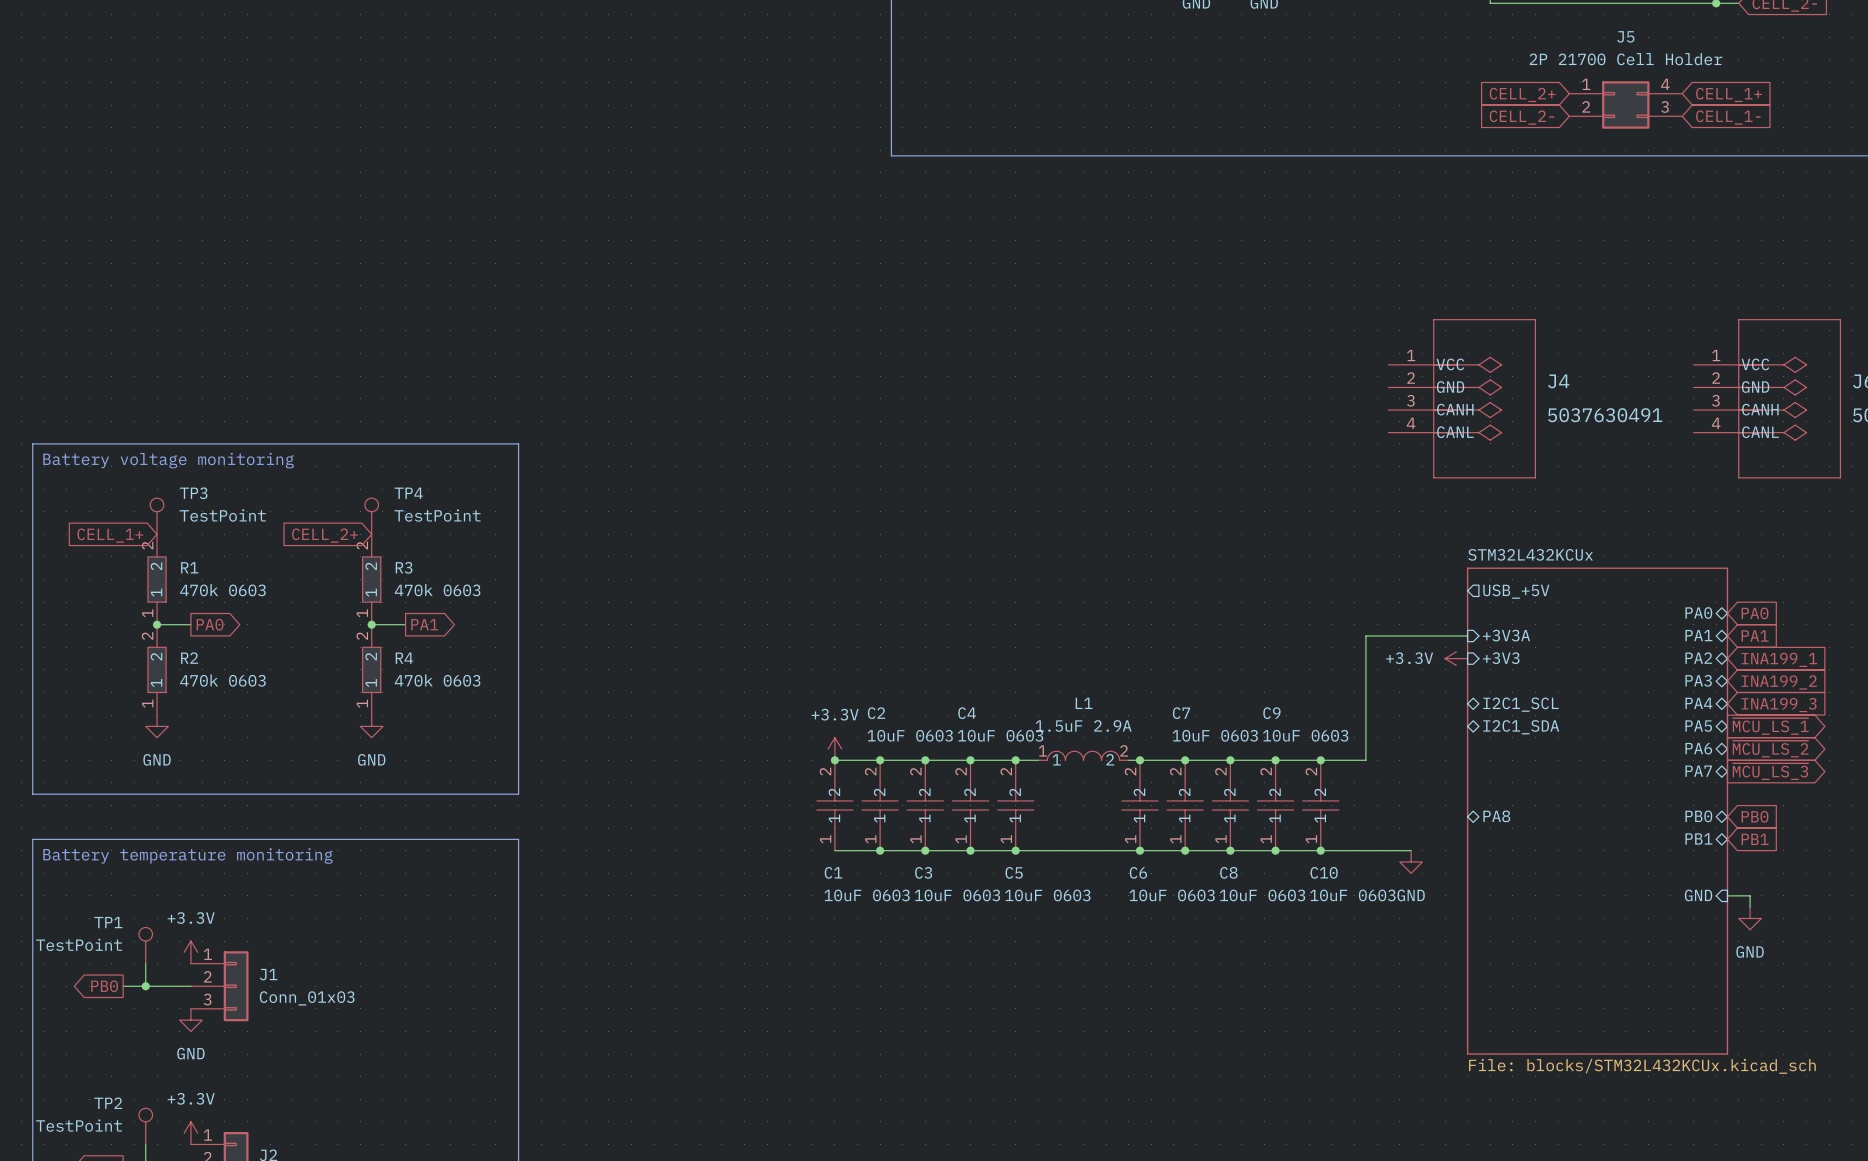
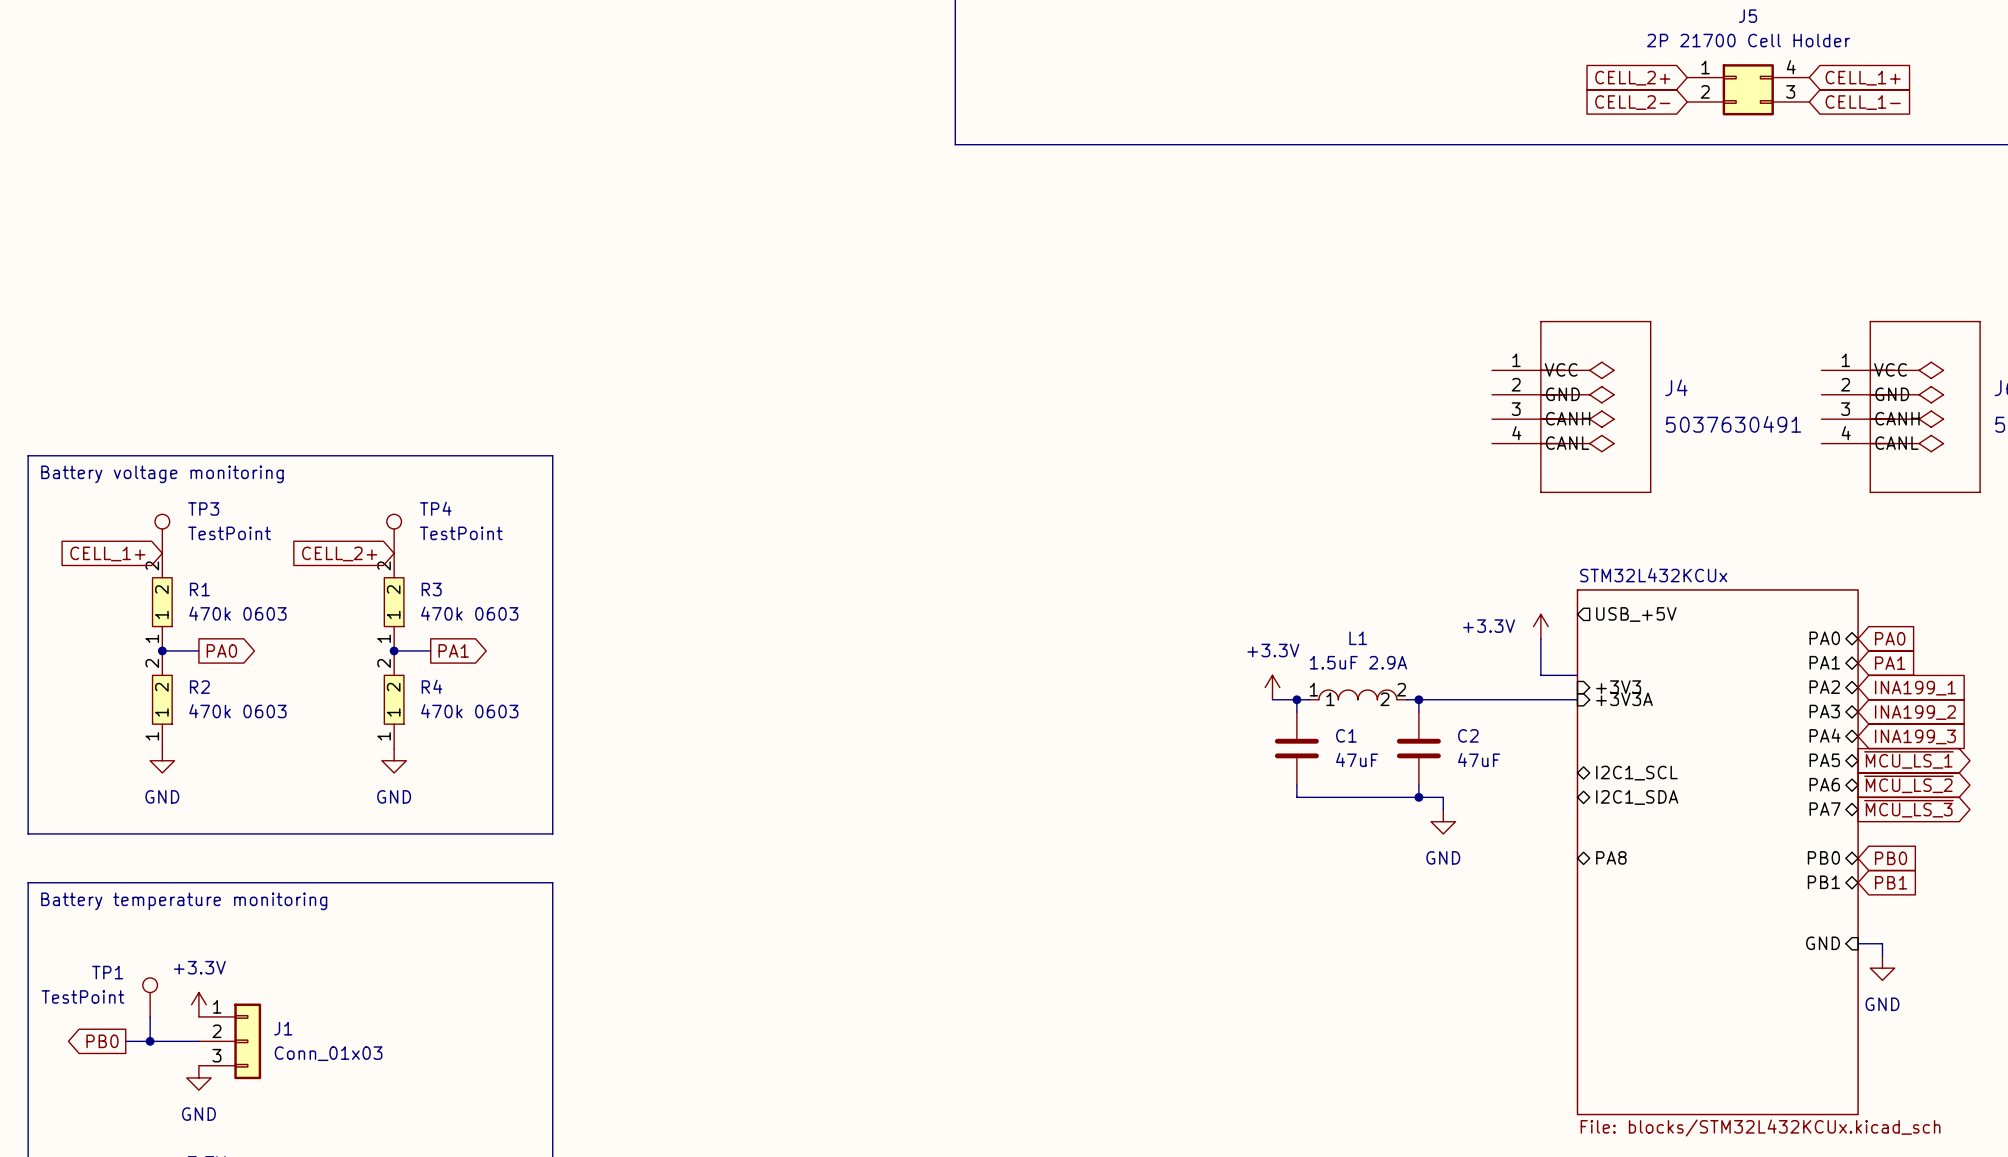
wire: none -> (1540, 638) (1540, 675) (1577, 675)
sheet pin position: +3V3A (1506, 635) -> +3V3A (1624, 699)
wire: (1467, 636) (1365, 636) (1365, 760) (1343, 760) -> (1443, 809) (1443, 797)
power symbol: none -> +3.3V (1272, 687)
power symbol rotation: 0° (1456, 658) -> 90° clockwise (1540, 626)
power symbol position: +3.3V (1456, 658) -> +3.3V (1540, 626)
wire: none -> (1272, 699) (1309, 699)
wire: none -> (1296, 699) (1296, 711)
junction: none -> (1296, 699)
wire: none -> (1406, 699) (1577, 699)
wire: none -> (1418, 699) (1418, 711)
junction: none -> (1418, 699)
sheet pin position: I2C1_SCL (1520, 704) -> I2C1_SCL (1636, 773)
C2 name position: C2 (876, 713) -> C2 (1468, 735)
sheet pin position: I2C1_SDA (1521, 727) -> I2C1_SDA (1637, 797)
C2 value: 10uF 0603 (910, 735) -> 47uF (1479, 760)
power symbol: +3.3V (834, 748) -> none
wire: none -> (1418, 785) (1418, 797)
L1 position: (1083, 755) -> (1357, 694)
C1 symbol: [816, 760, 853, 851] -> [1274, 711, 1319, 786]
wire: (834, 760) (1038, 760) -> none
junction: (834, 760) -> none
C2 symbol: [862, 760, 899, 851] -> [1396, 711, 1441, 786]
junction: (880, 760) -> none
junction: (925, 760) -> none
junction: (970, 760) -> none
junction: (1015, 760) -> none
wire: (1128, 760) (1207, 760) -> (1296, 785) (1296, 797)
junction: (1139, 760) -> none
junction: (1185, 760) -> none
junction: (1230, 760) -> none
junction: (1275, 760) -> none
C3: 10uF 0603 (925, 805) -> none
C4: 10uF 0603 (970, 805) -> none
C5: 10uF 0603 (1015, 805) -> none
C6: 10uF 0603 (1139, 805) -> none
C7: 10uF 0603 (1185, 805) -> none
C8: 10uF 0603 (1230, 805) -> none
C9: 10uF 0603 (1275, 805) -> none
C10: 10uF 0603 (1320, 805) -> none
wire: (834, 850) (1411, 850) -> none
junction: (880, 850) -> none
junction: (925, 850) -> none
junction: (970, 850) -> none
junction: (1015, 850) -> none
junction: (1139, 850) -> none
junction: (1185, 850) -> none
junction: (1230, 850) -> none
junction: (1275, 850) -> none
junction: (1320, 850) -> none
power symbol position: GND (1411, 861) -> GND (1443, 821)
C1 name position: C1 (833, 872) -> C1 (1346, 735)
C1 value: 10uF 0603 (867, 895) -> 47uF (1357, 760)

